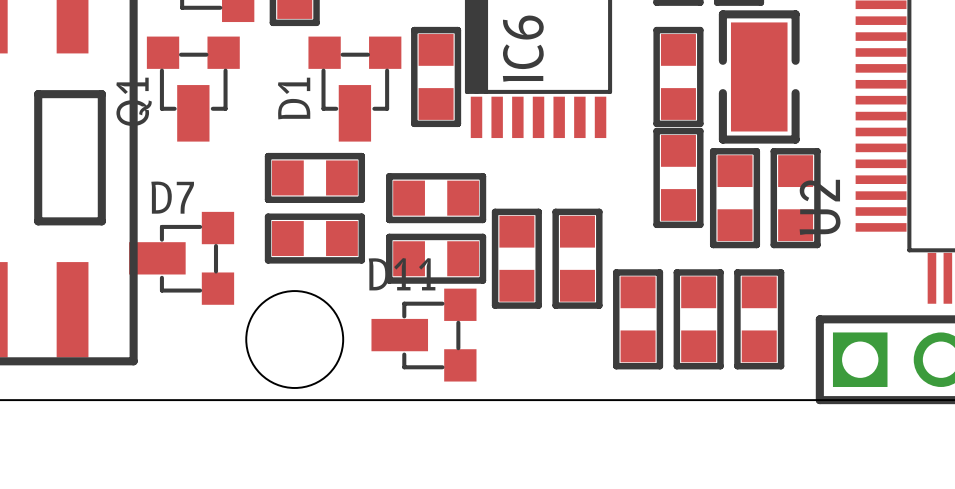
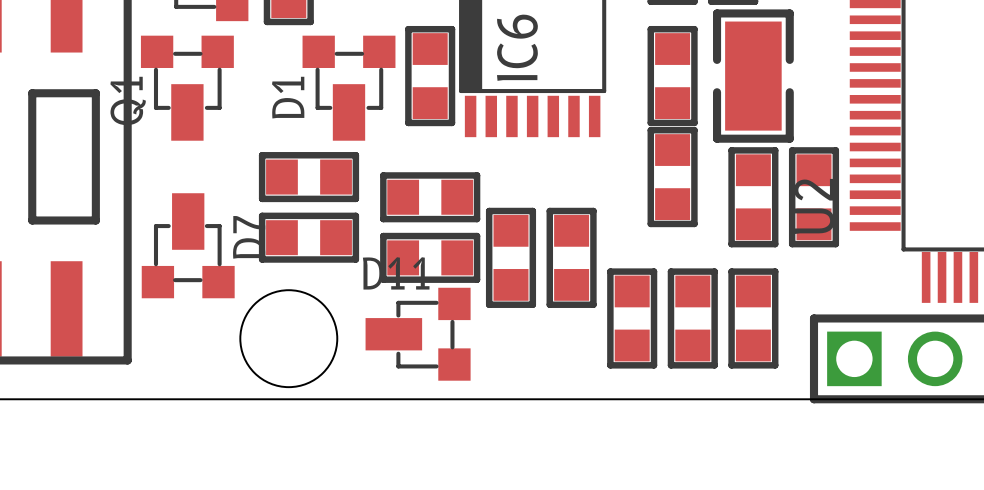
part: (735, 198) -> none
part: none -> (753, 197)
part: (795, 198) -> none
part: none -> (814, 197)
D7 rotation: 0° (181, 258) -> 90° clockwise (188, 245)

